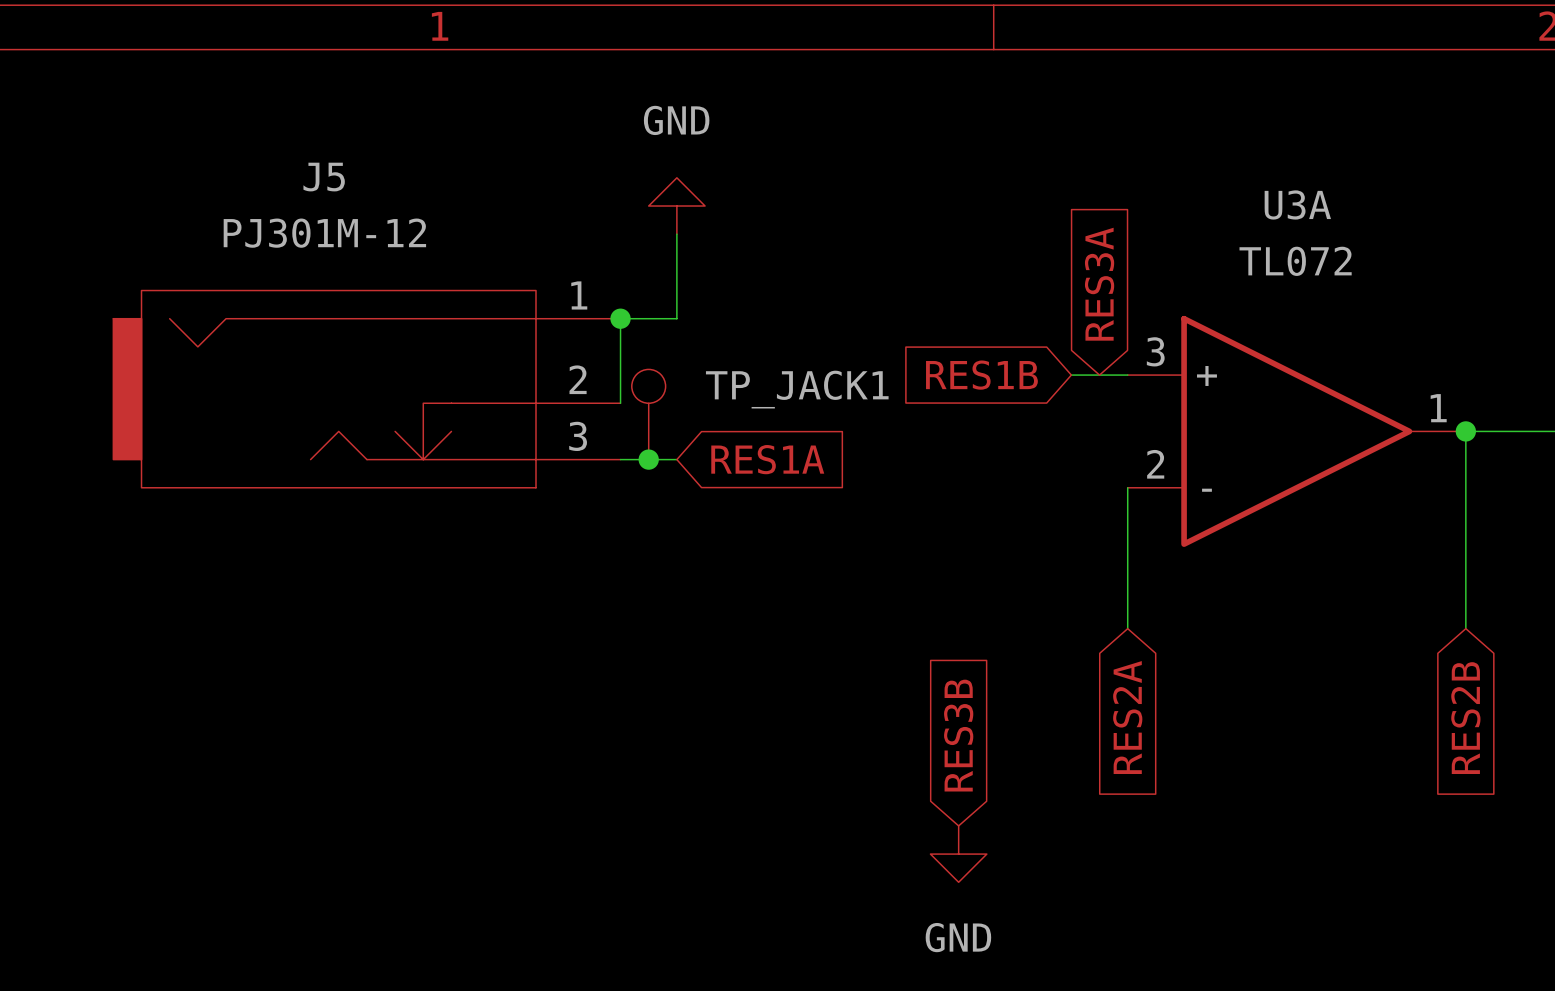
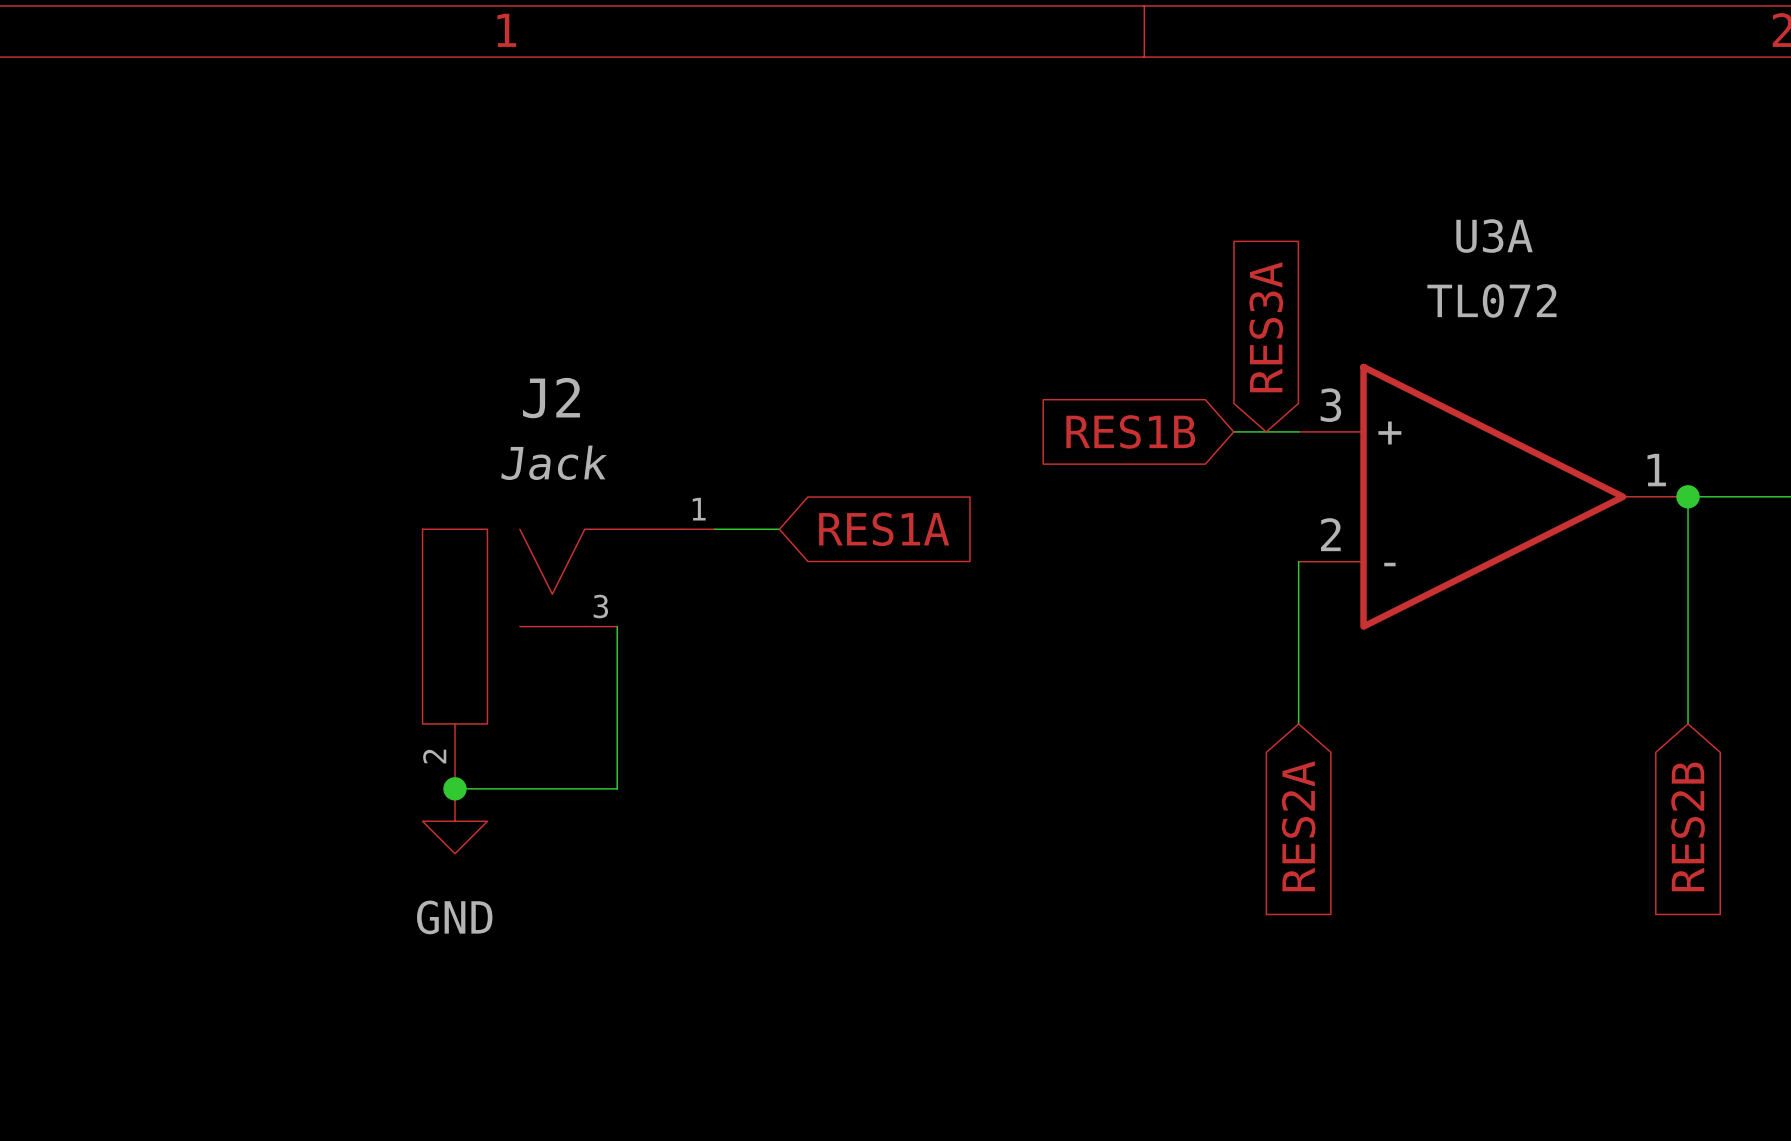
power symbol: GND (676, 206) -> none
wire: (676, 234) (676, 318) (620, 318) (620, 403) -> none
junction: (620, 318) -> none
J5: PJ301M-12 (366, 389) -> none
TP_JACK1: (648, 414) -> none
junction: (648, 459) -> none
wire: none -> (617, 626) (617, 788) (454, 788)
J2: none -> (568, 659)
junction: none -> (454, 788)
power symbol: none -> GND (454, 821)
global label: RES3B (958, 735) -> none
power symbol: GND (958, 854) -> none

